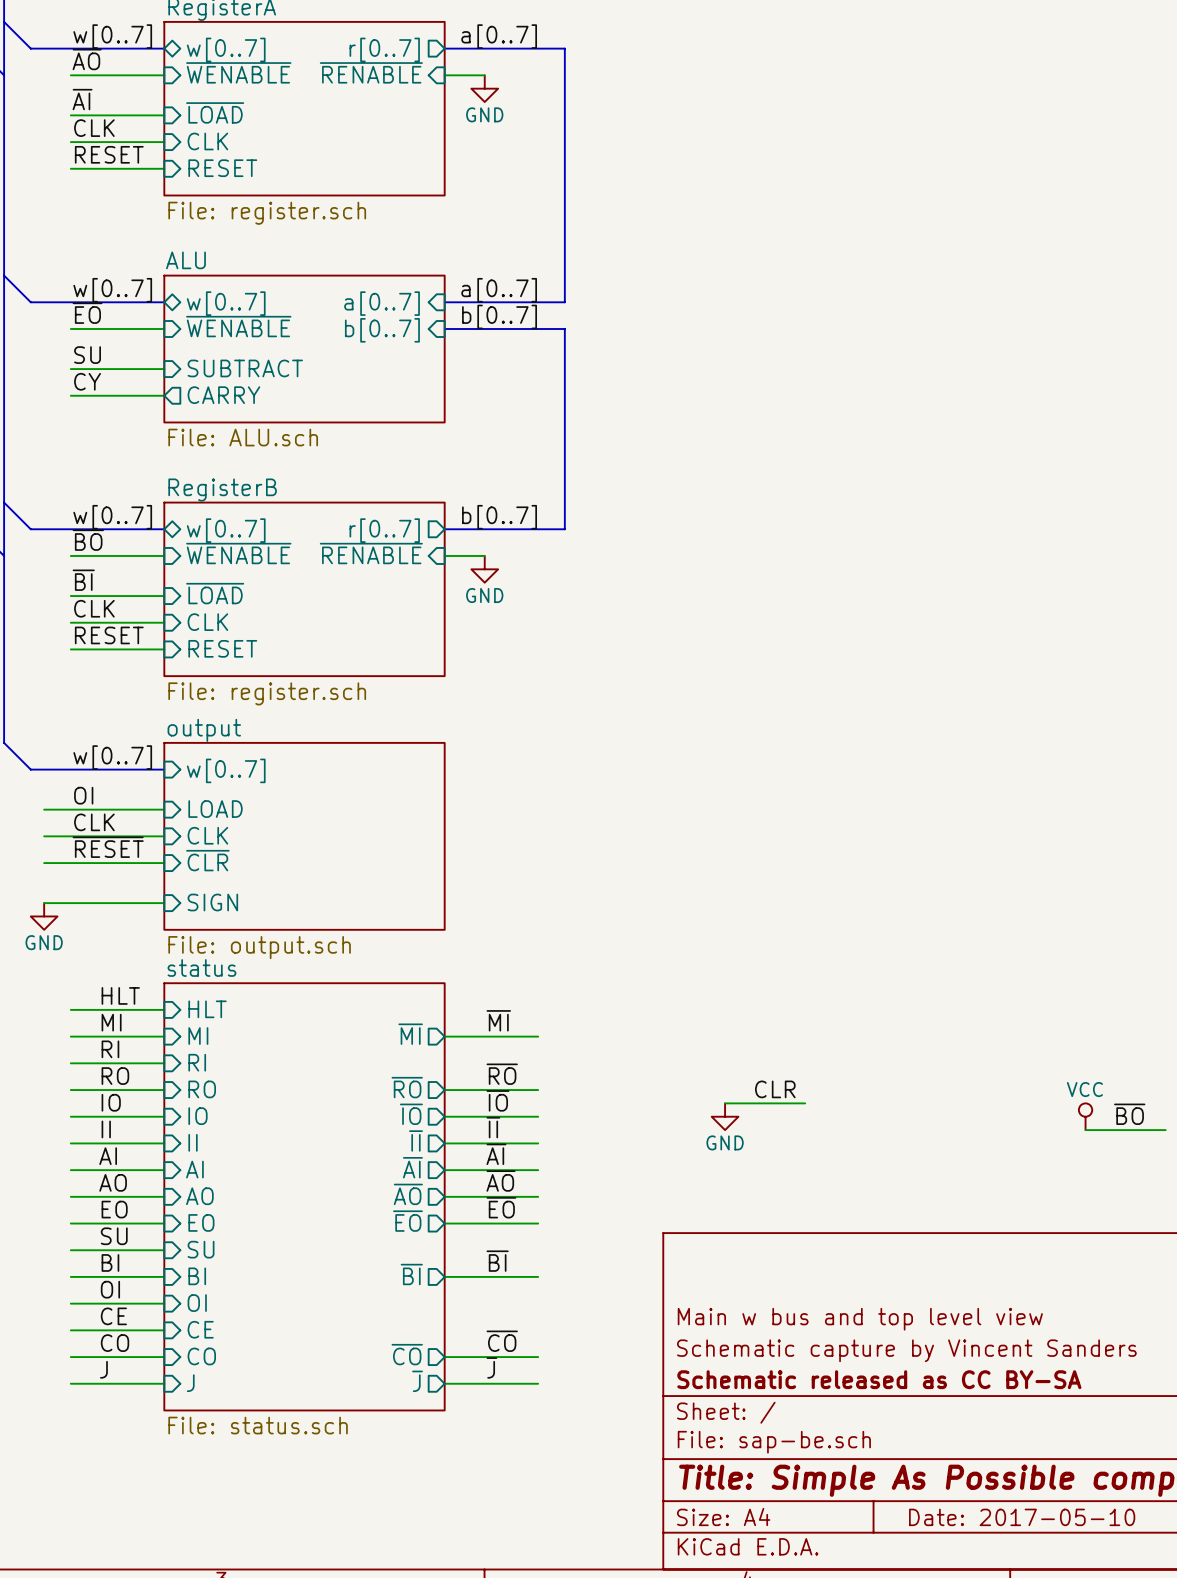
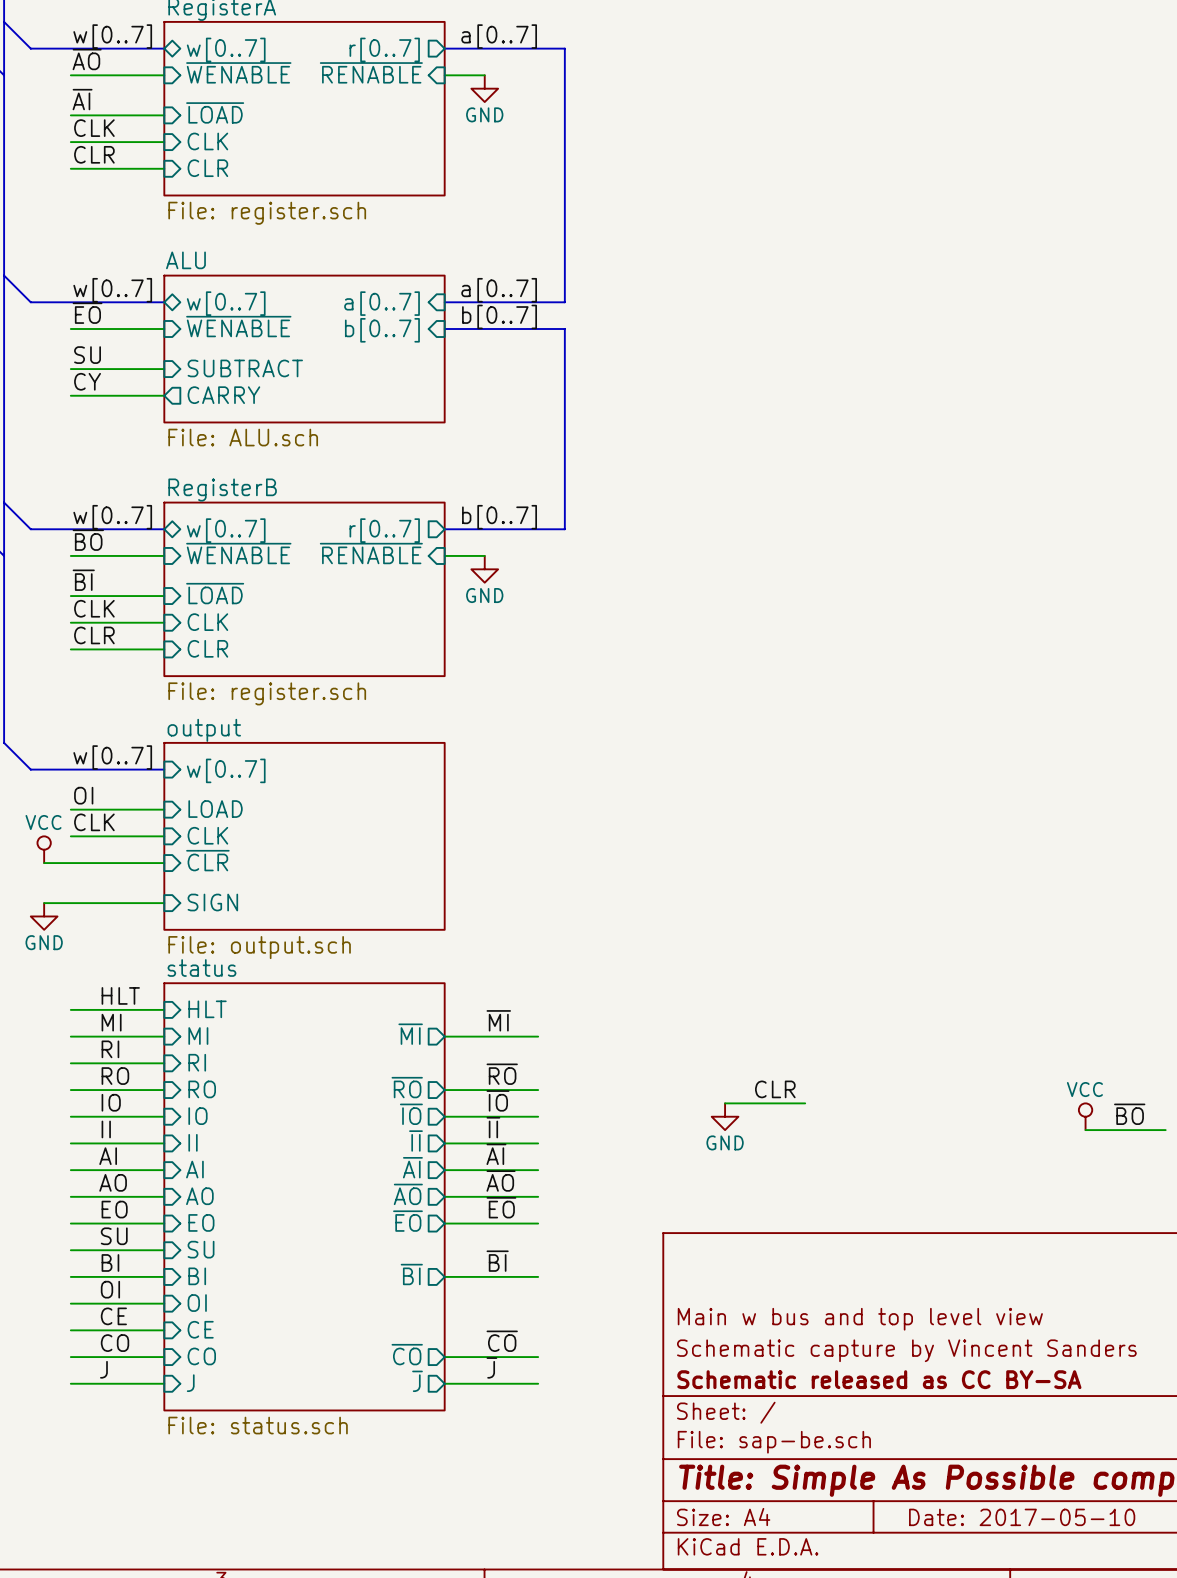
label: RESET (109, 154) -> CLR (94, 154)
sheet pin: RESET (222, 168) -> CLR (207, 168)
label: RESET (109, 635) -> CLR (94, 635)
sheet pin: RESET (222, 648) -> CLR (207, 648)
wire: (44, 809) (70, 809) -> none
wire: (44, 836) (70, 836) -> none
label: ~{RESET} (108, 847) -> none
power symbol: none -> VCC (44, 849)

